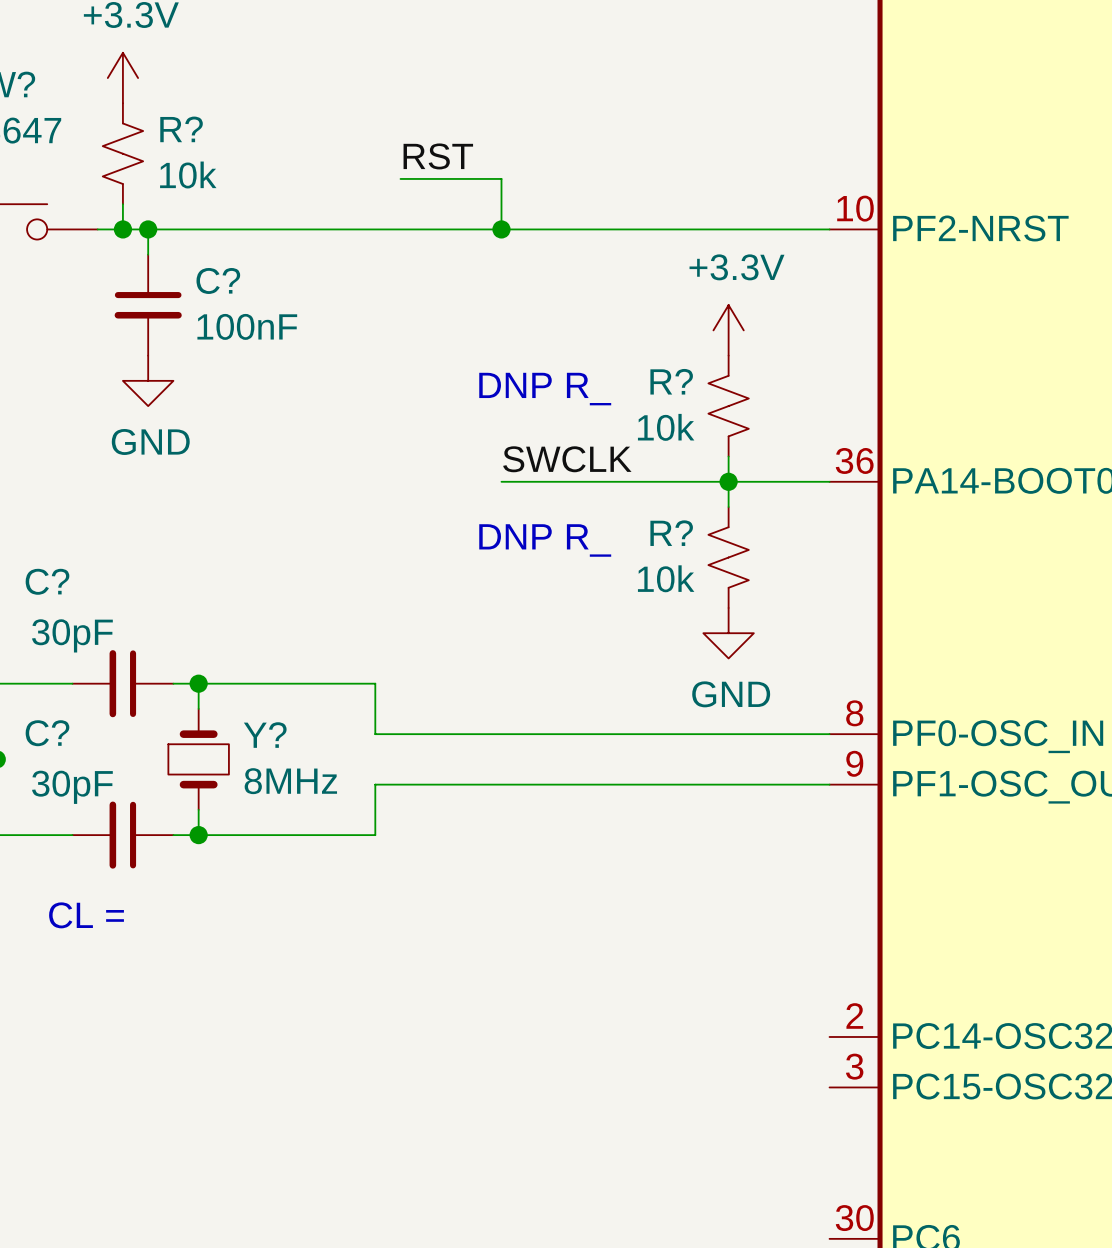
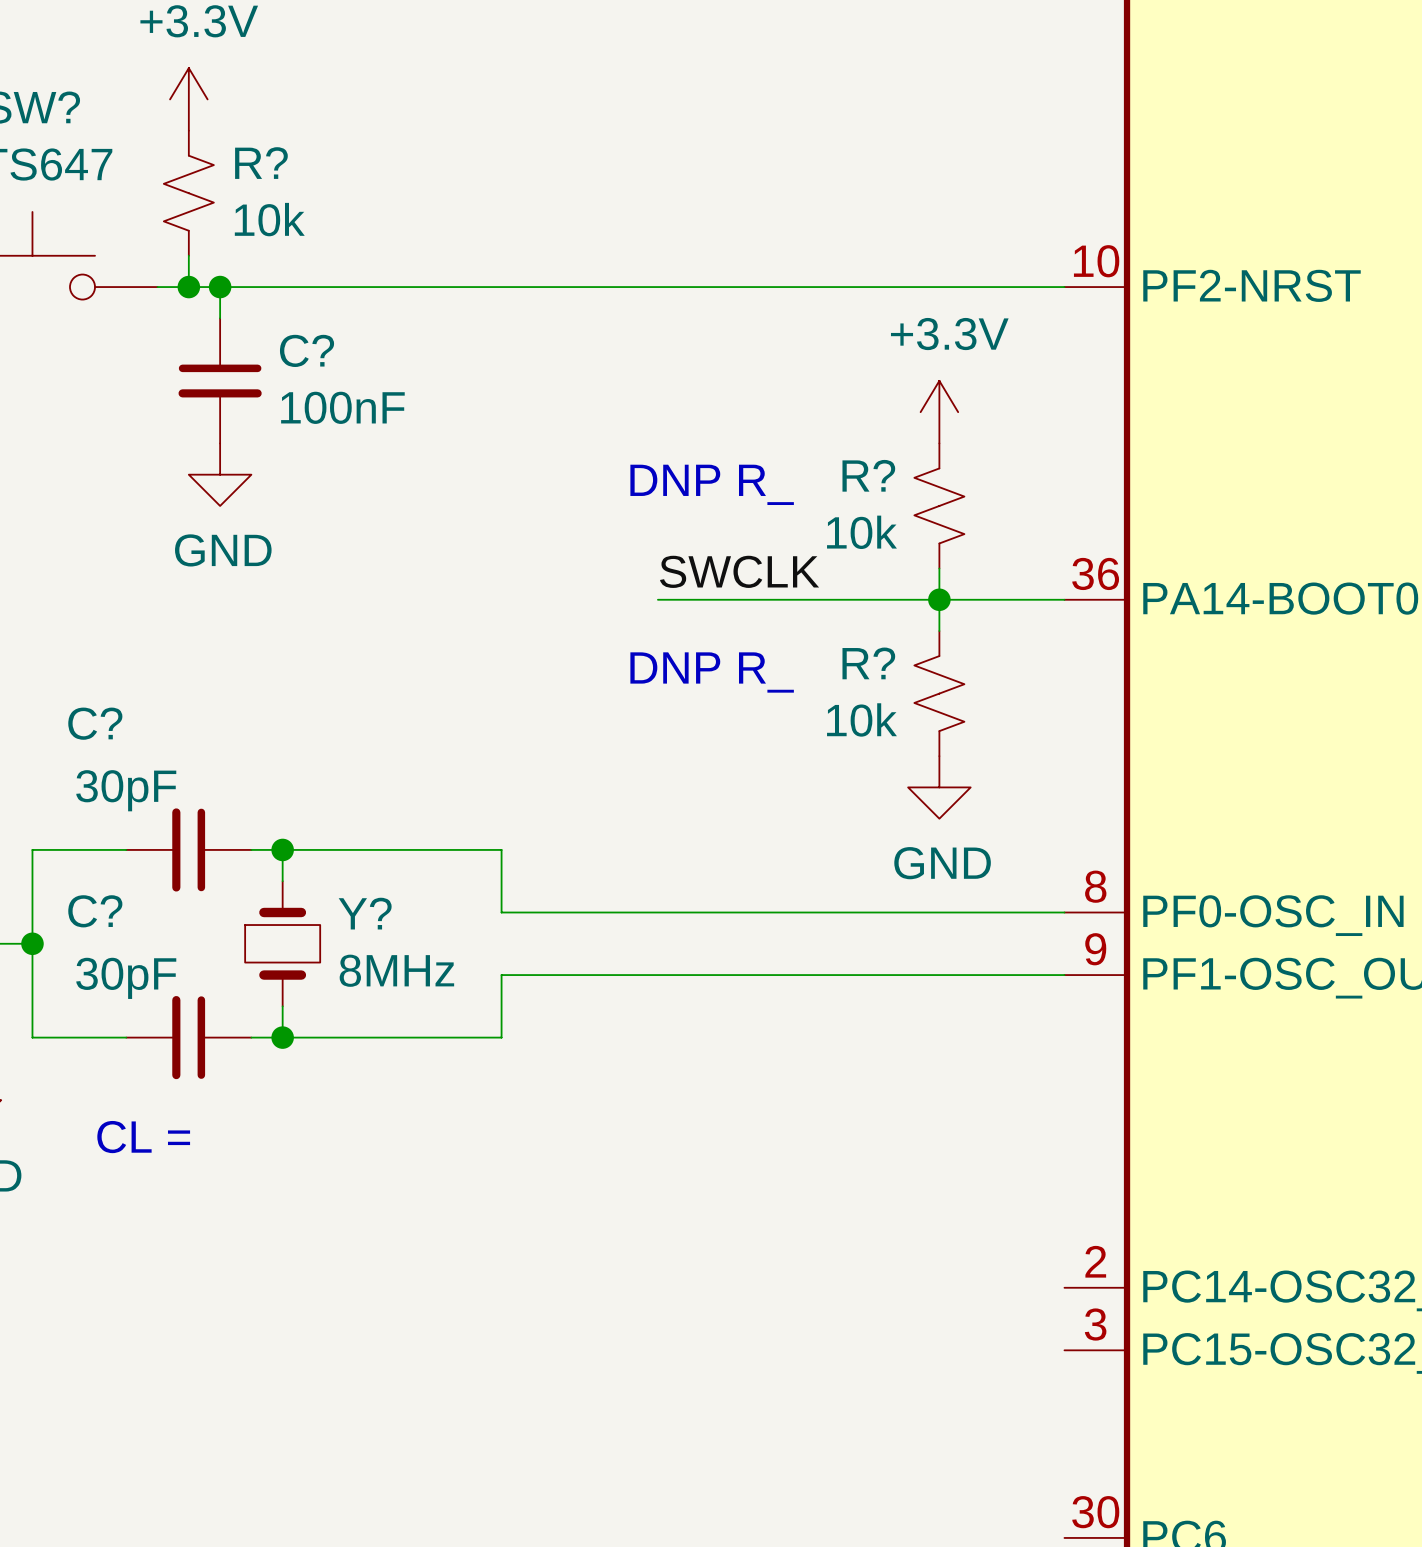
label: RST (438, 156) -> none
wire: (400, 178) (501, 178) (501, 229) -> none
junction: (501, 229) -> none

